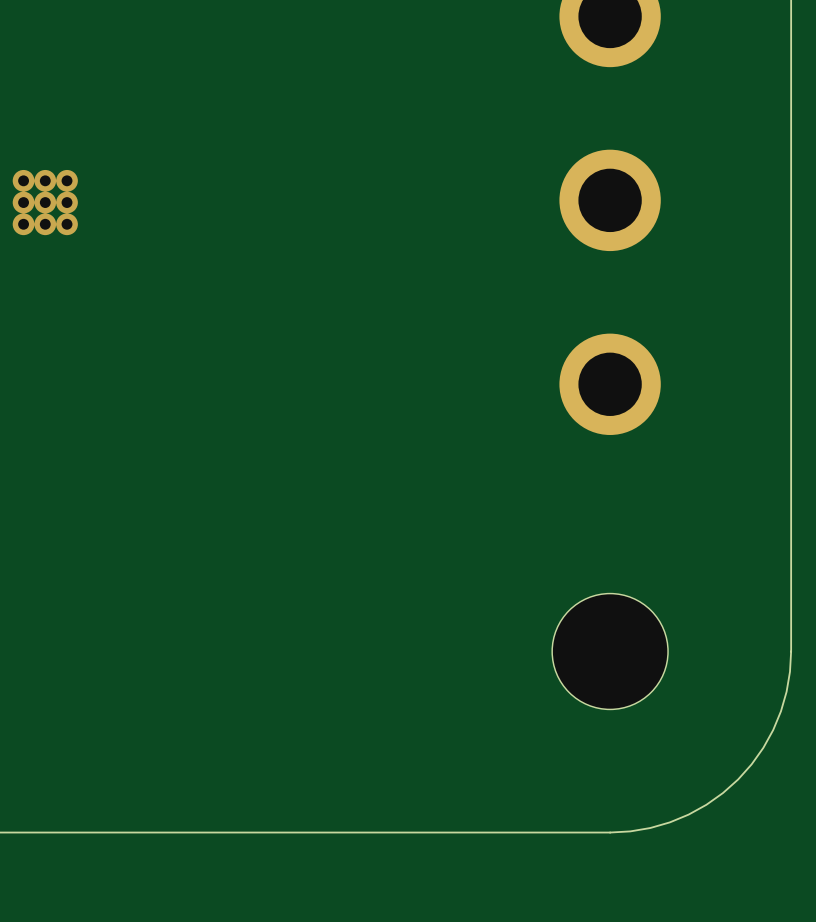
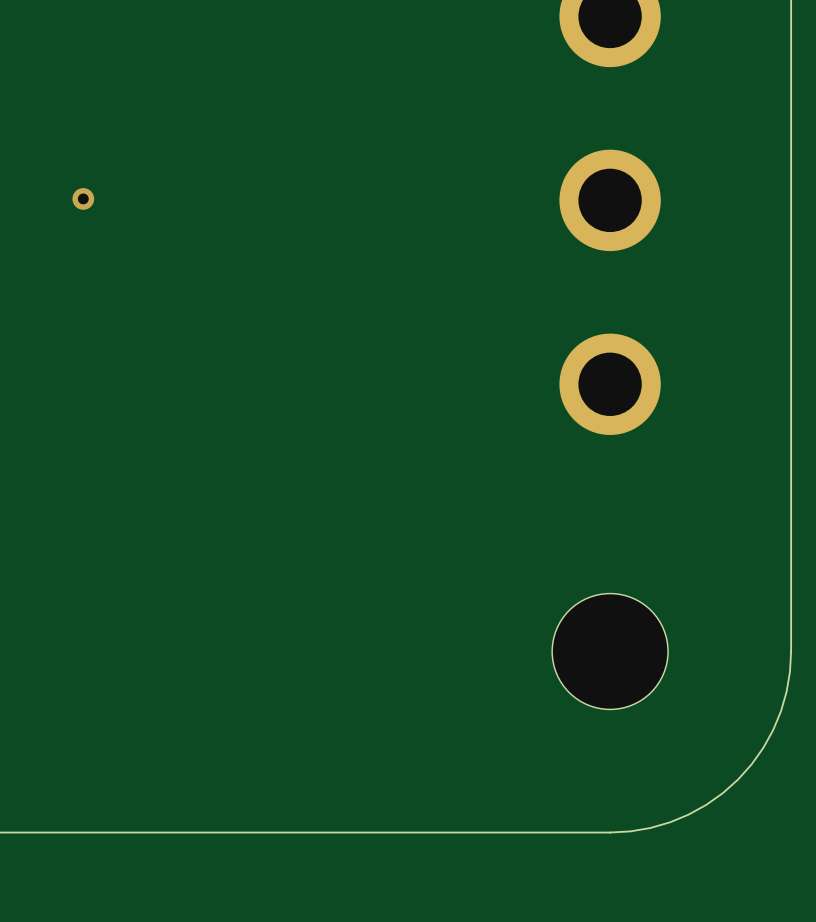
via: (23, 180) -> none
via: (45, 180) -> none
via: (67, 180) -> none
via: none -> (83, 198)
via: (23, 202) -> none
via: (45, 202) -> none
via: (67, 202) -> none
via: (23, 224) -> none
via: (45, 224) -> none
via: (67, 224) -> none

